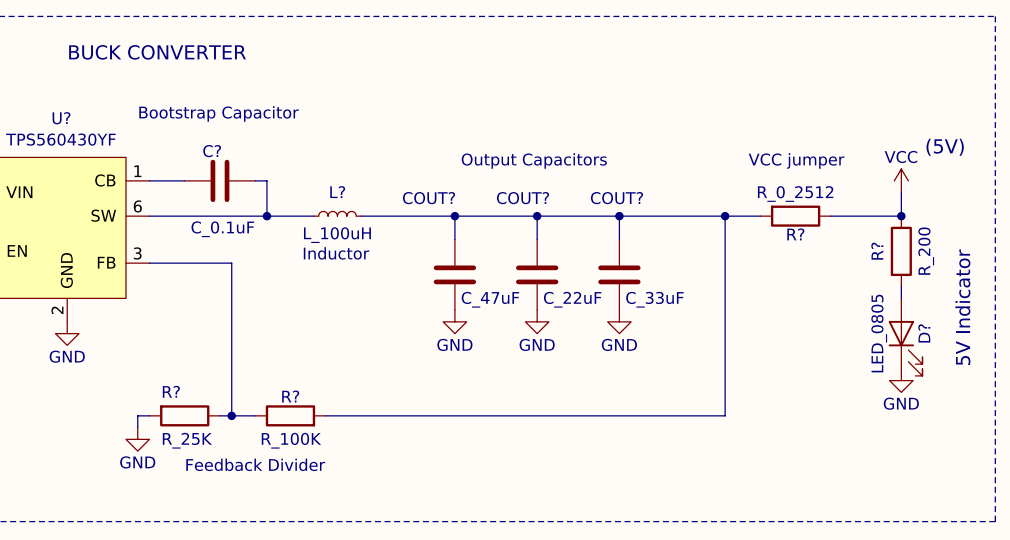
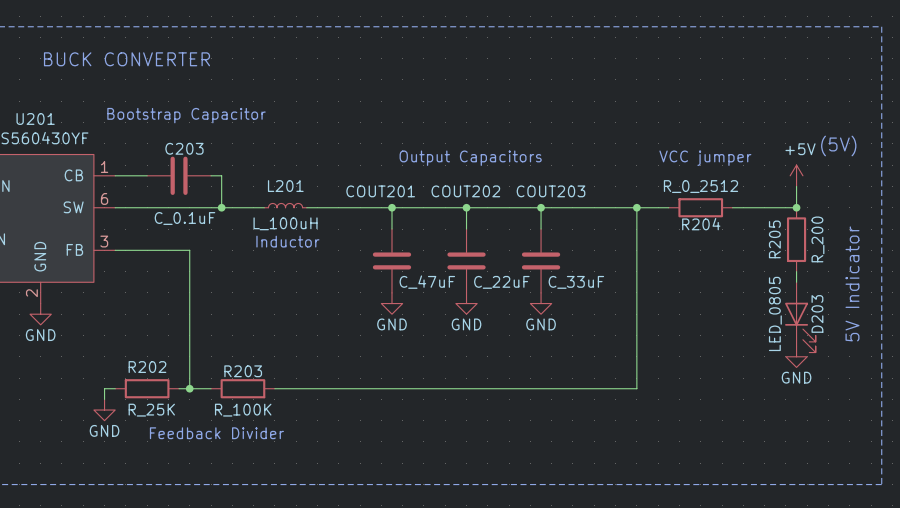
U? name: U? (61, 118) -> U201 (35, 118)
C? name: C? (212, 151) -> C203 (184, 148)
power symbol: VCC (901, 180) -> +5V (796, 175)
L? name: L? (337, 192) -> L201 (285, 186)
COUT? name: COUT? (429, 198) -> COUT201 (380, 191)
COUT? name: COUT? (523, 198) -> COUT202 (465, 191)
COUT? name: COUT? (616, 198) -> COUT203 (551, 191)
R? name: R? (795, 234) -> R204 (701, 224)
R? name: R? (877, 251) -> R205 (774, 239)
D? name: D? (924, 333) -> D203 (817, 313)
R? name: R? (171, 391) -> R202 (147, 367)
R? name: R? (290, 396) -> R203 (243, 371)

